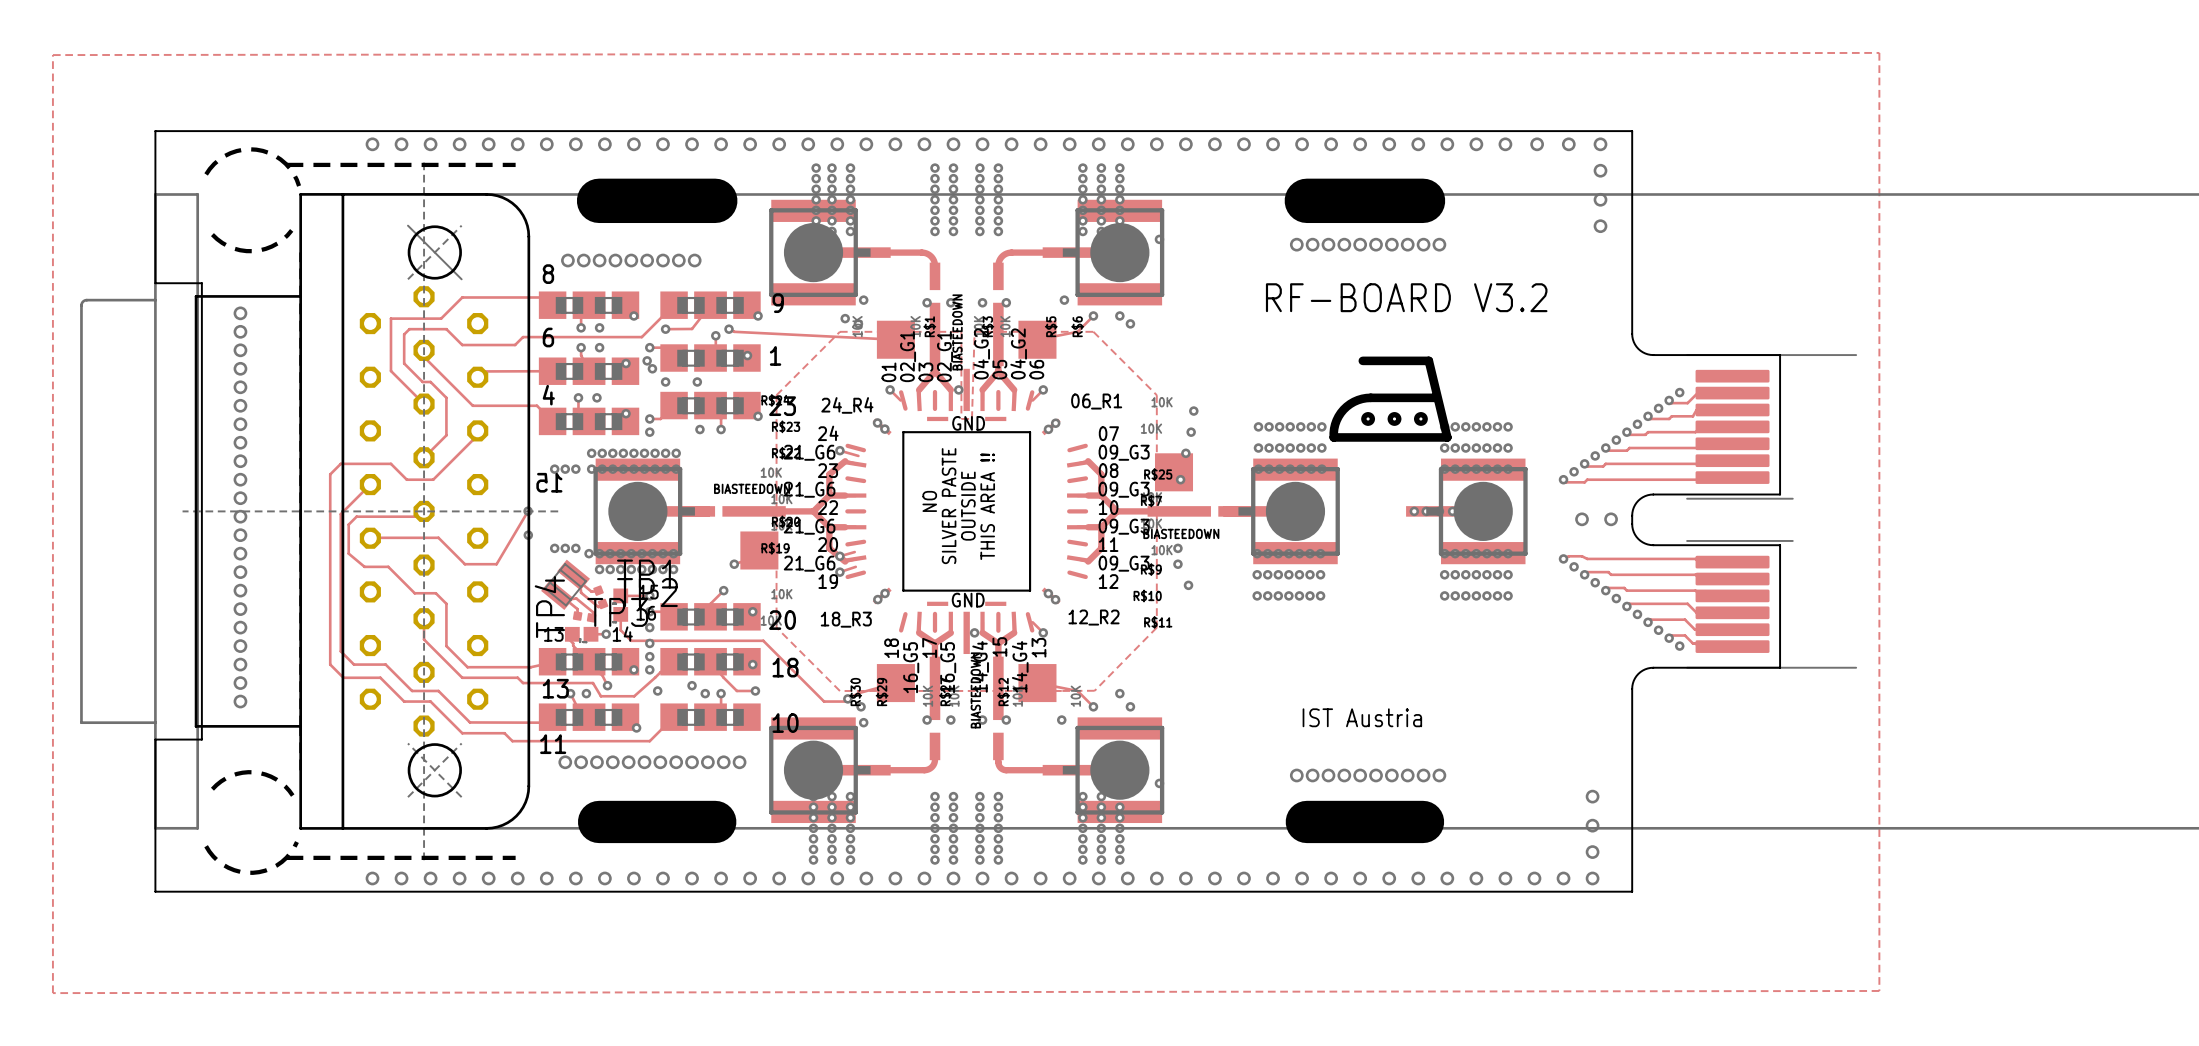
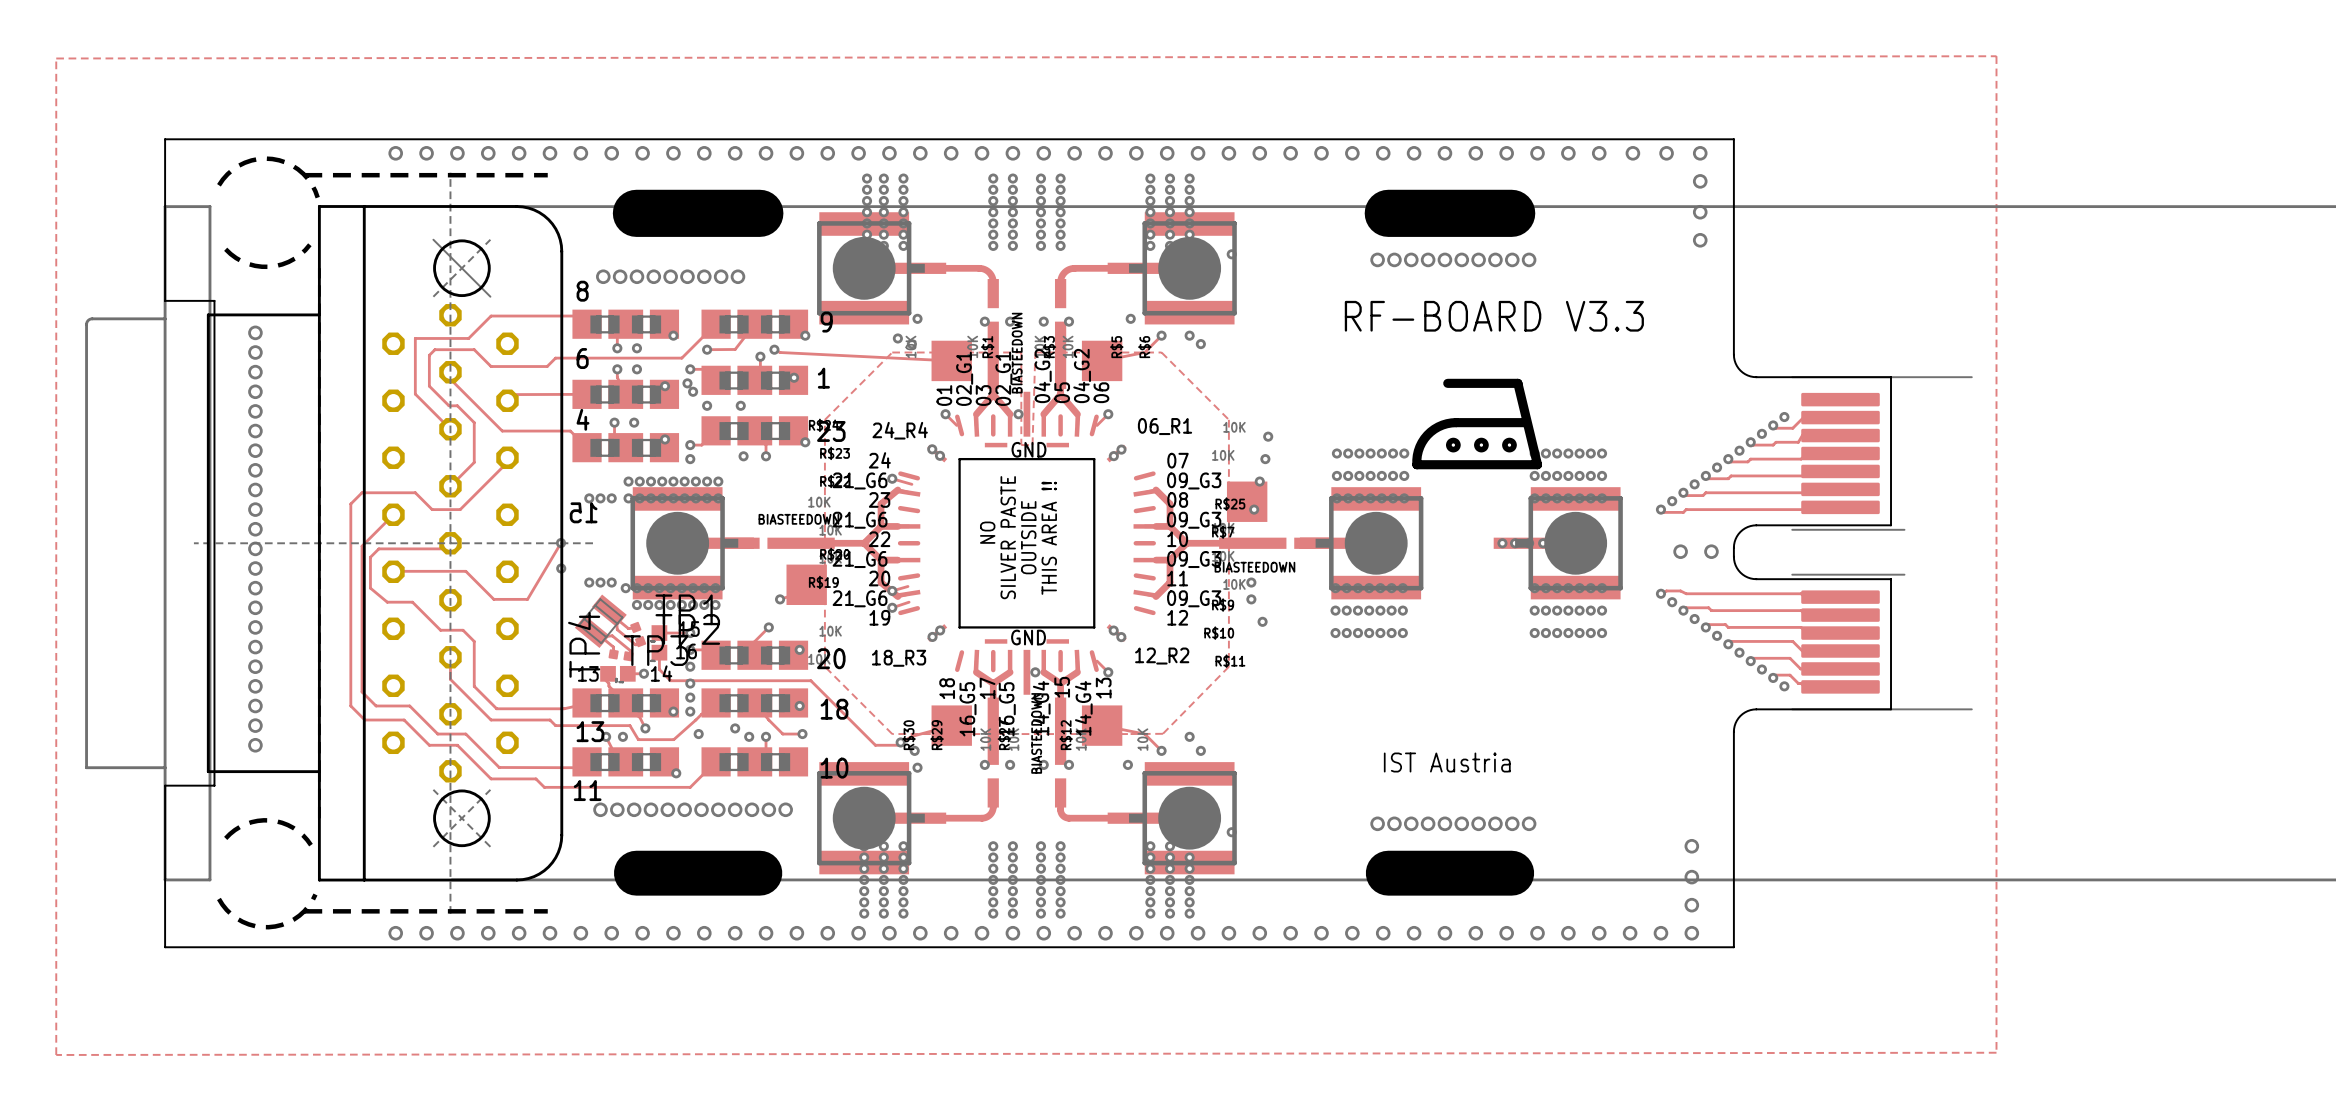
text: RF-BOARD V3.2 (1406, 297) -> RF-BOARD V3.3 (1494, 316)

